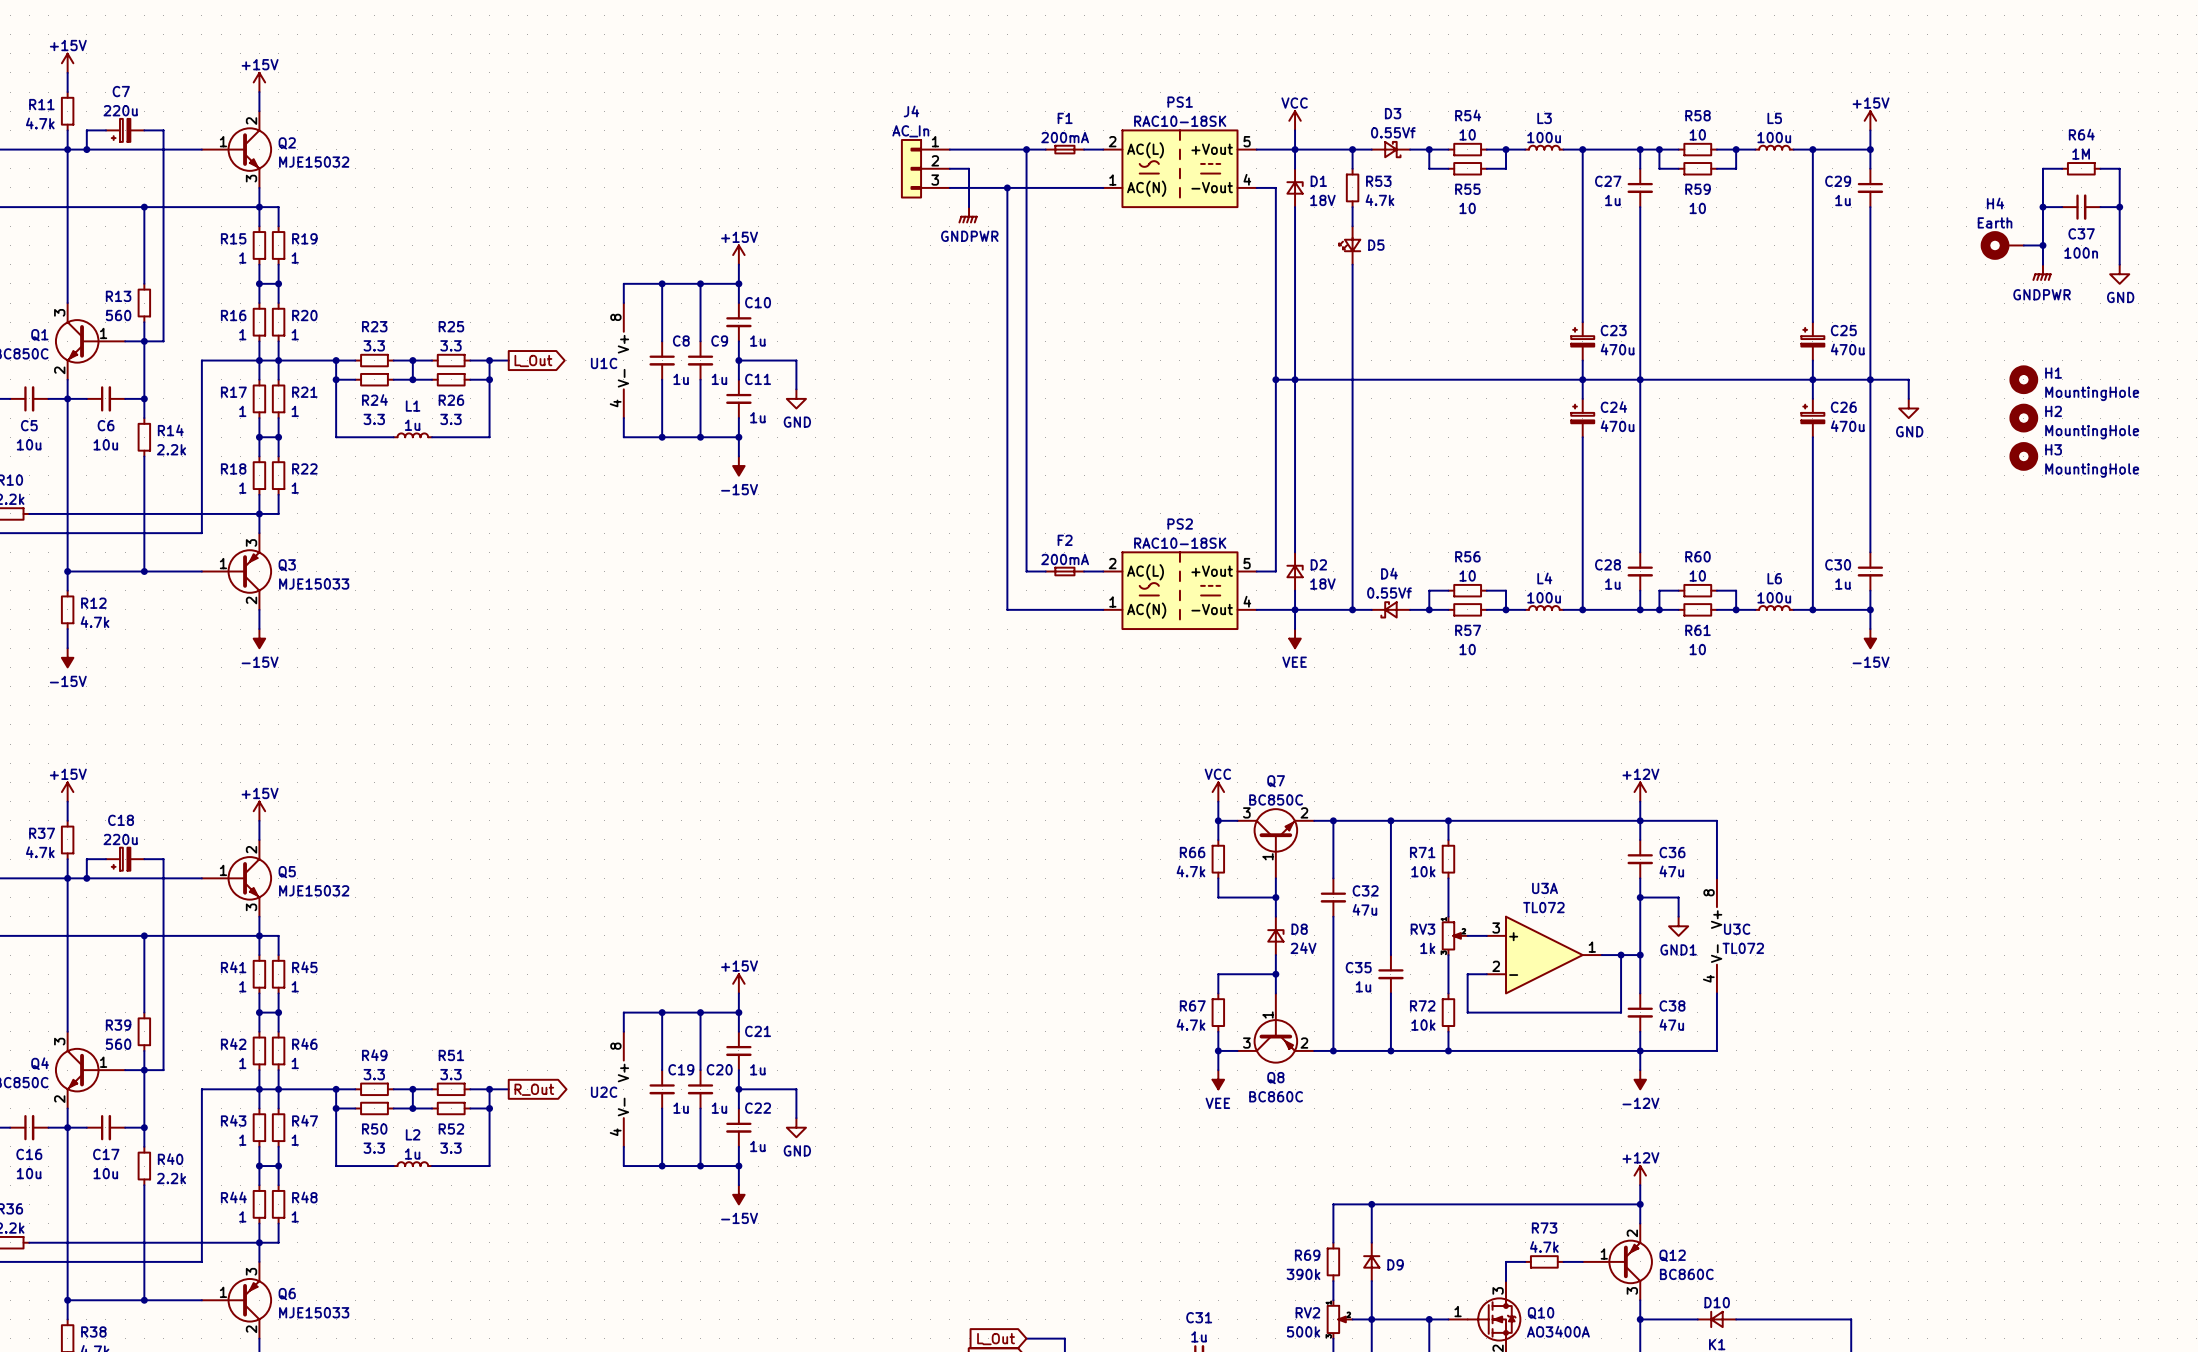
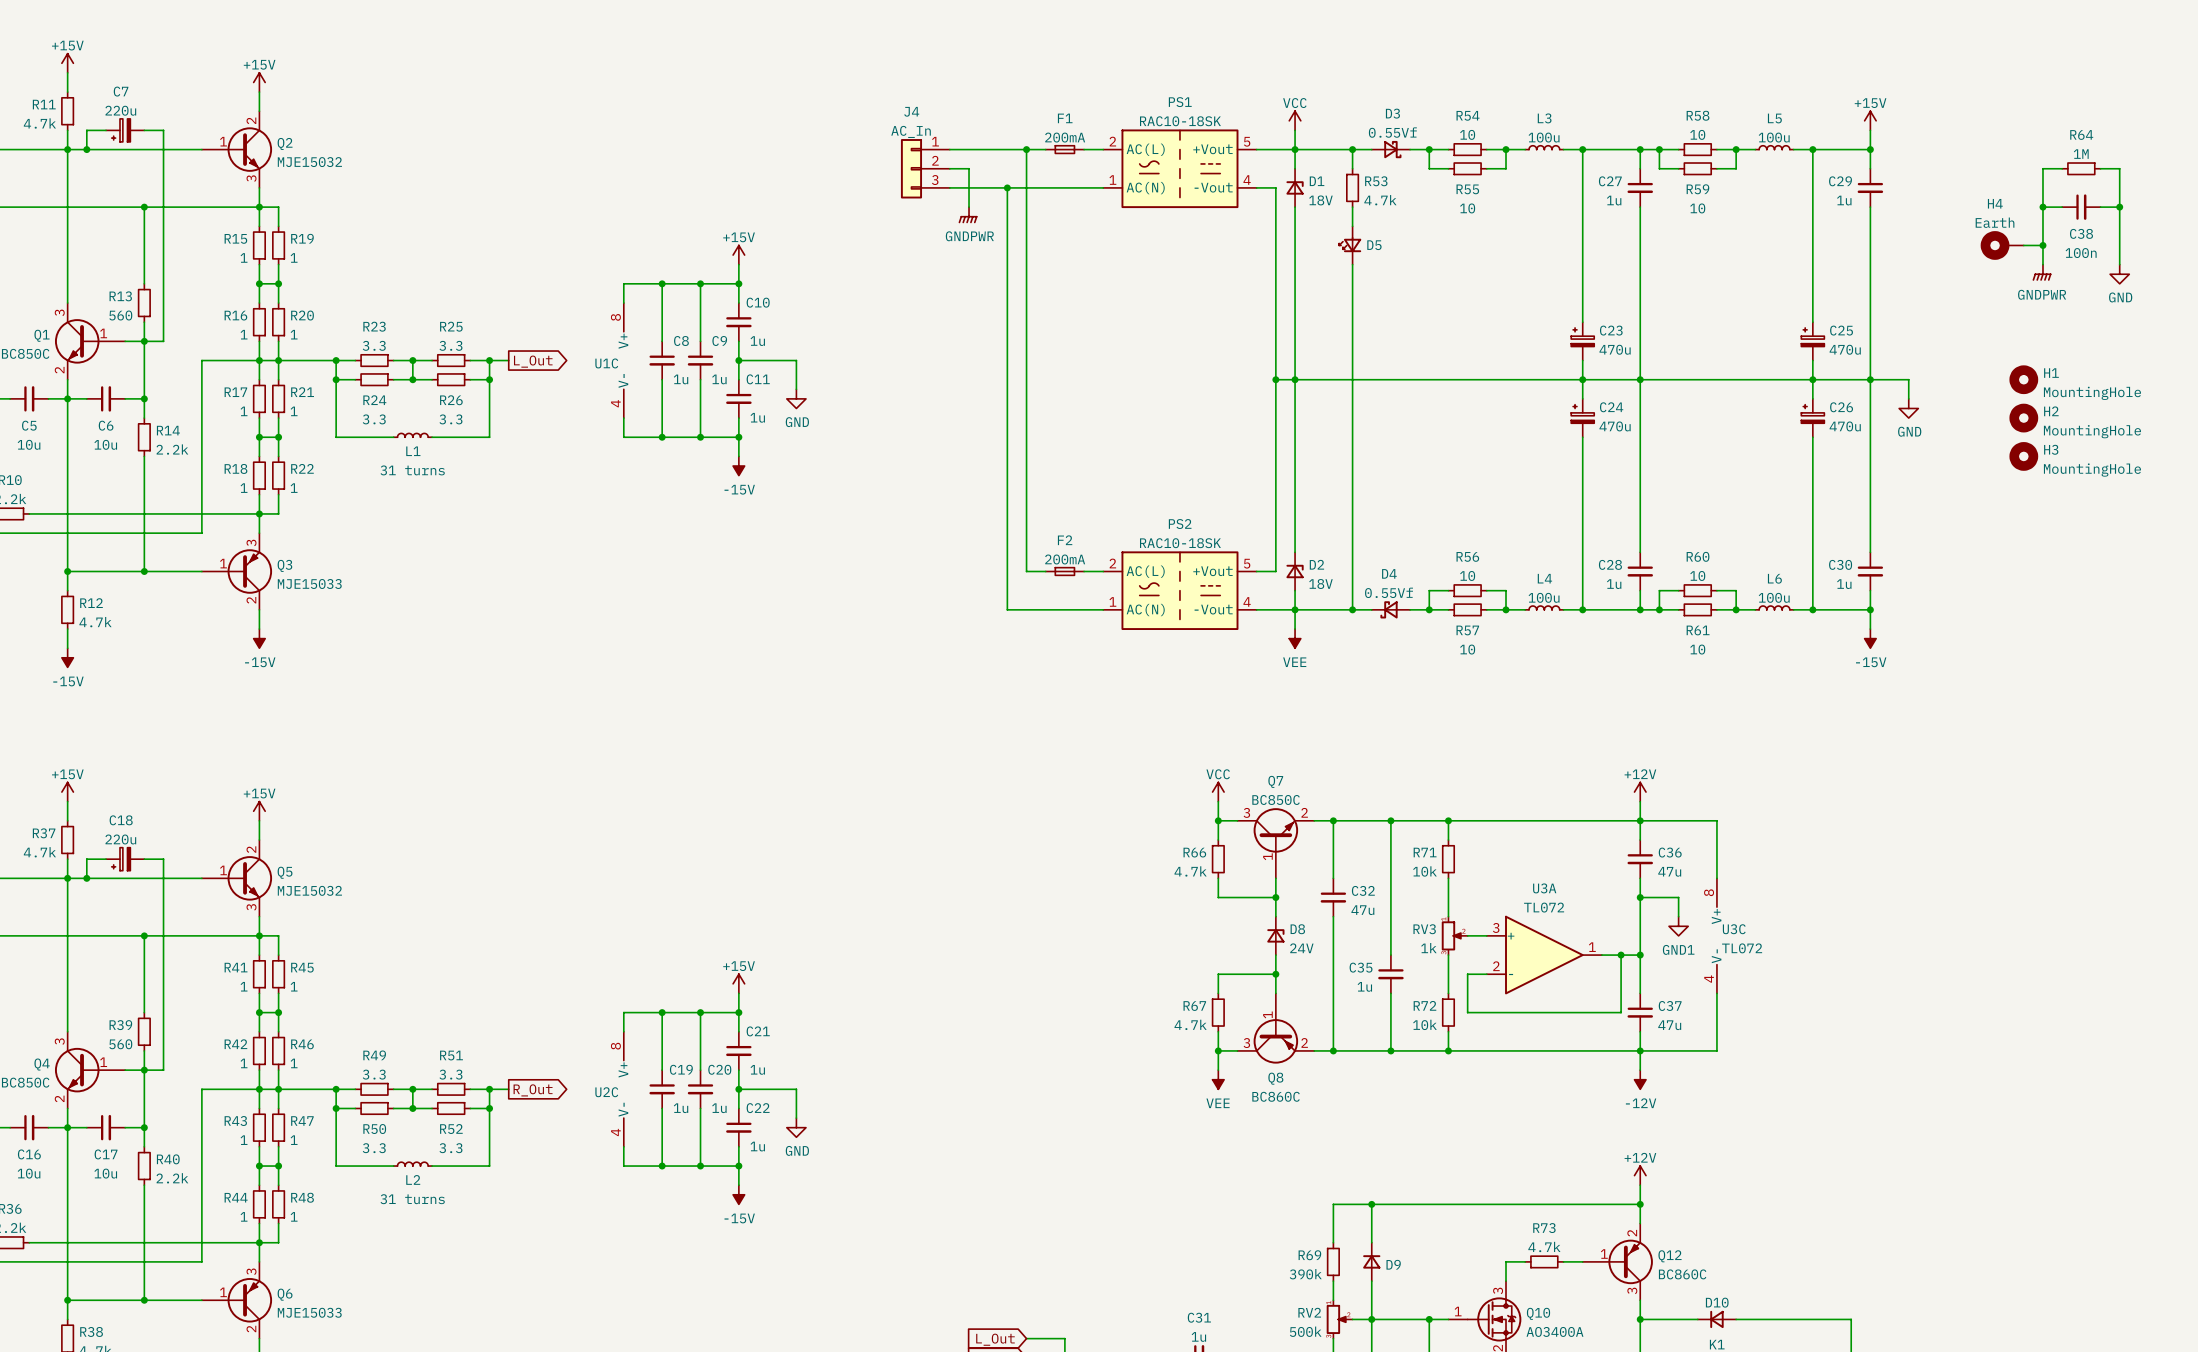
C37 name: C37 (2081, 233) -> C38 (2081, 233)
L1 name position: L1 (413, 406) -> L1 (413, 451)
L1 value: 1u (412, 425) -> 31 turns (412, 470)
C38 name: C38 (1672, 1005) -> C37 (1670, 1005)
L2 name position: L2 (413, 1134) -> L2 (413, 1179)
L2 value: 1u (412, 1154) -> 31 turns (412, 1199)

